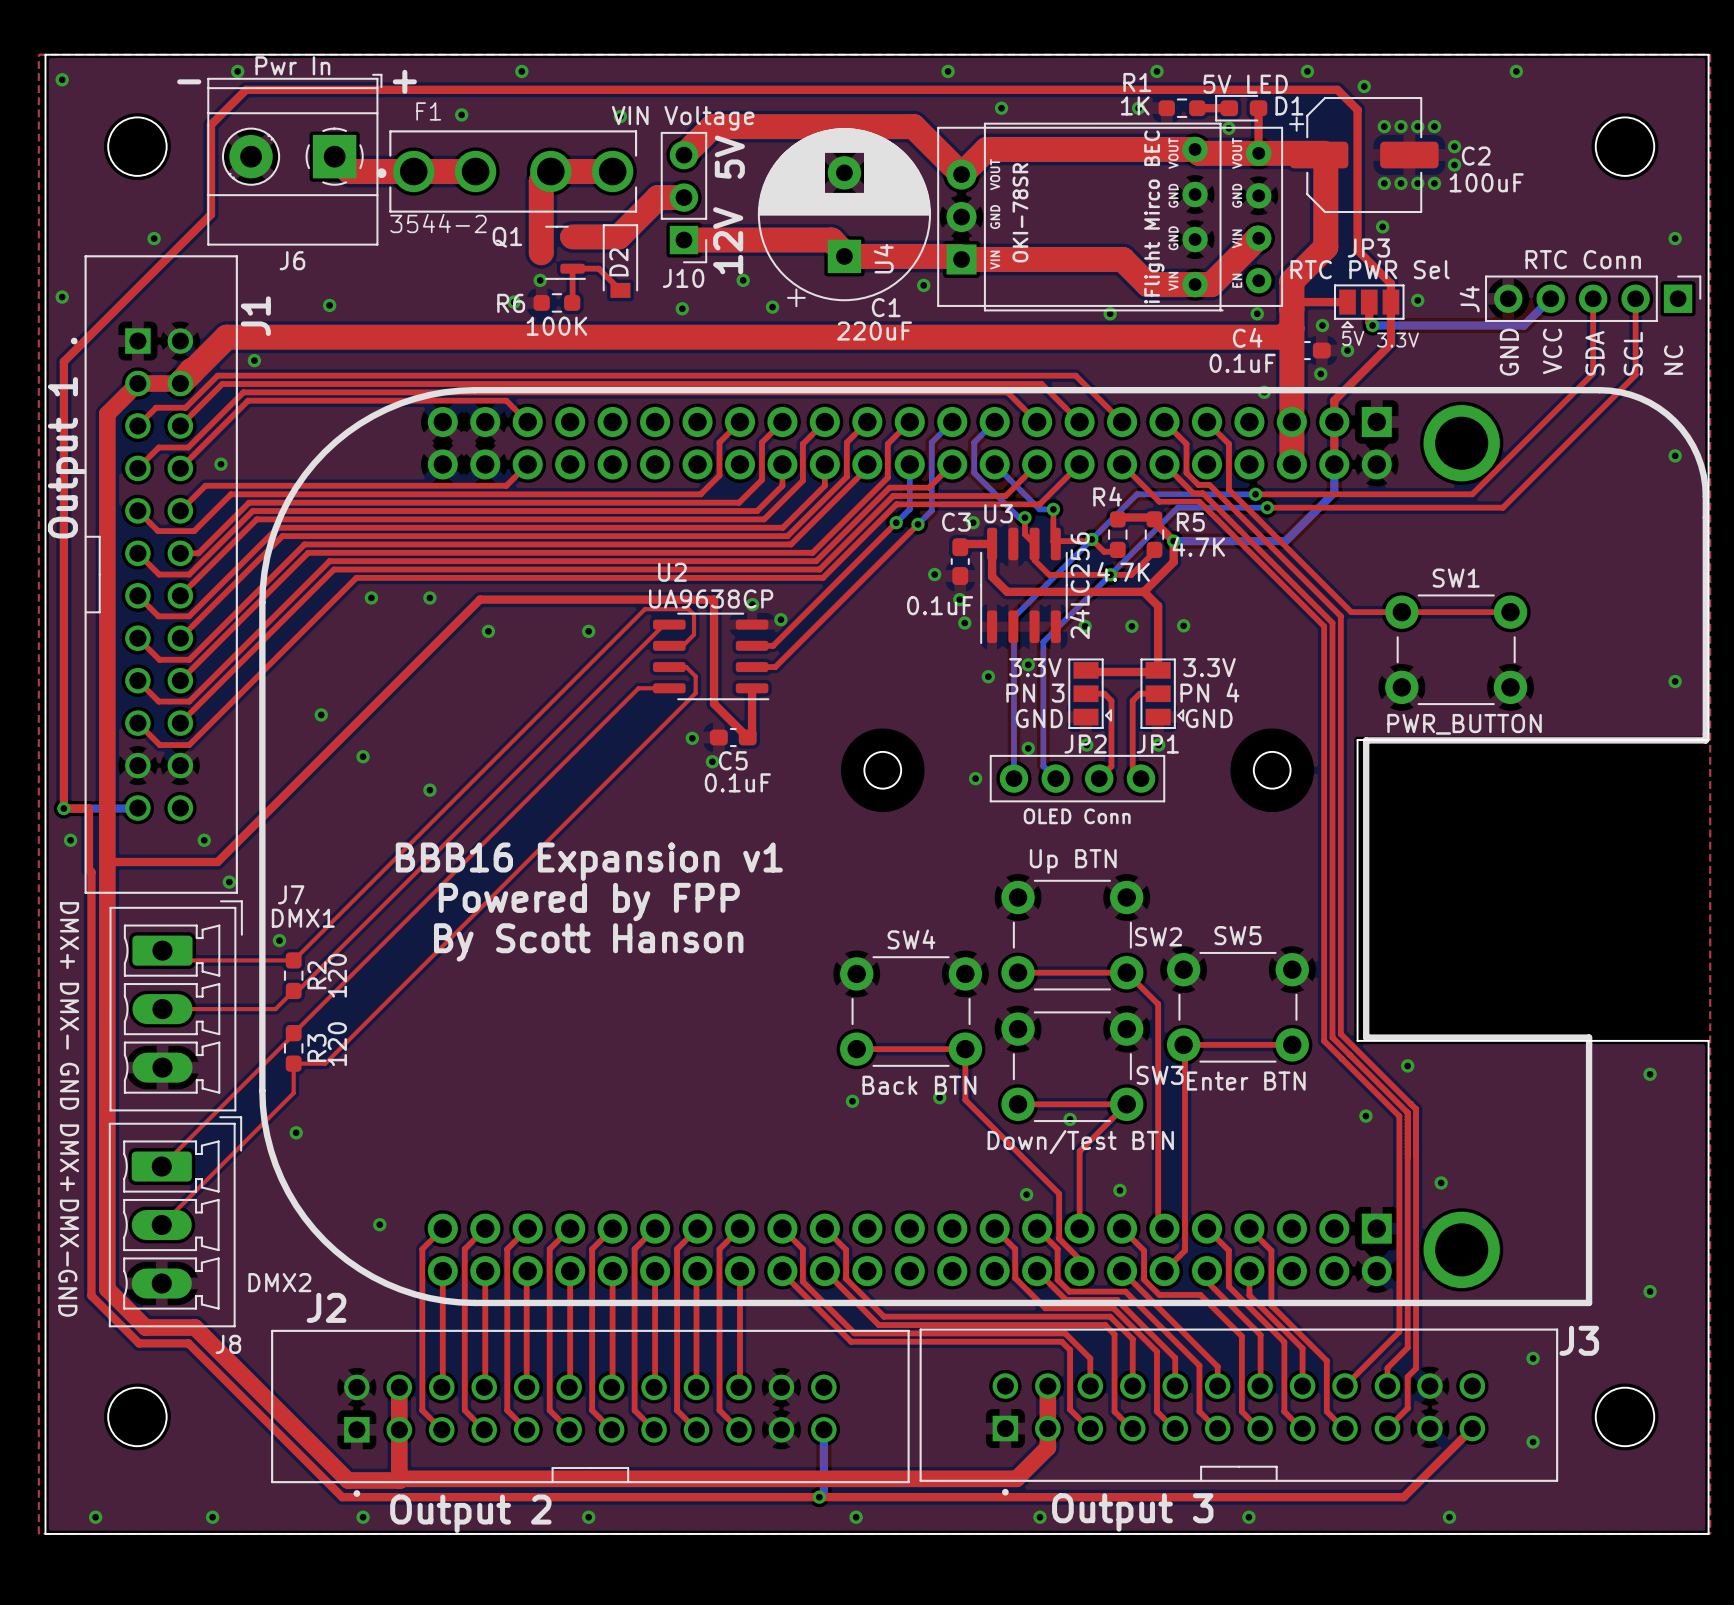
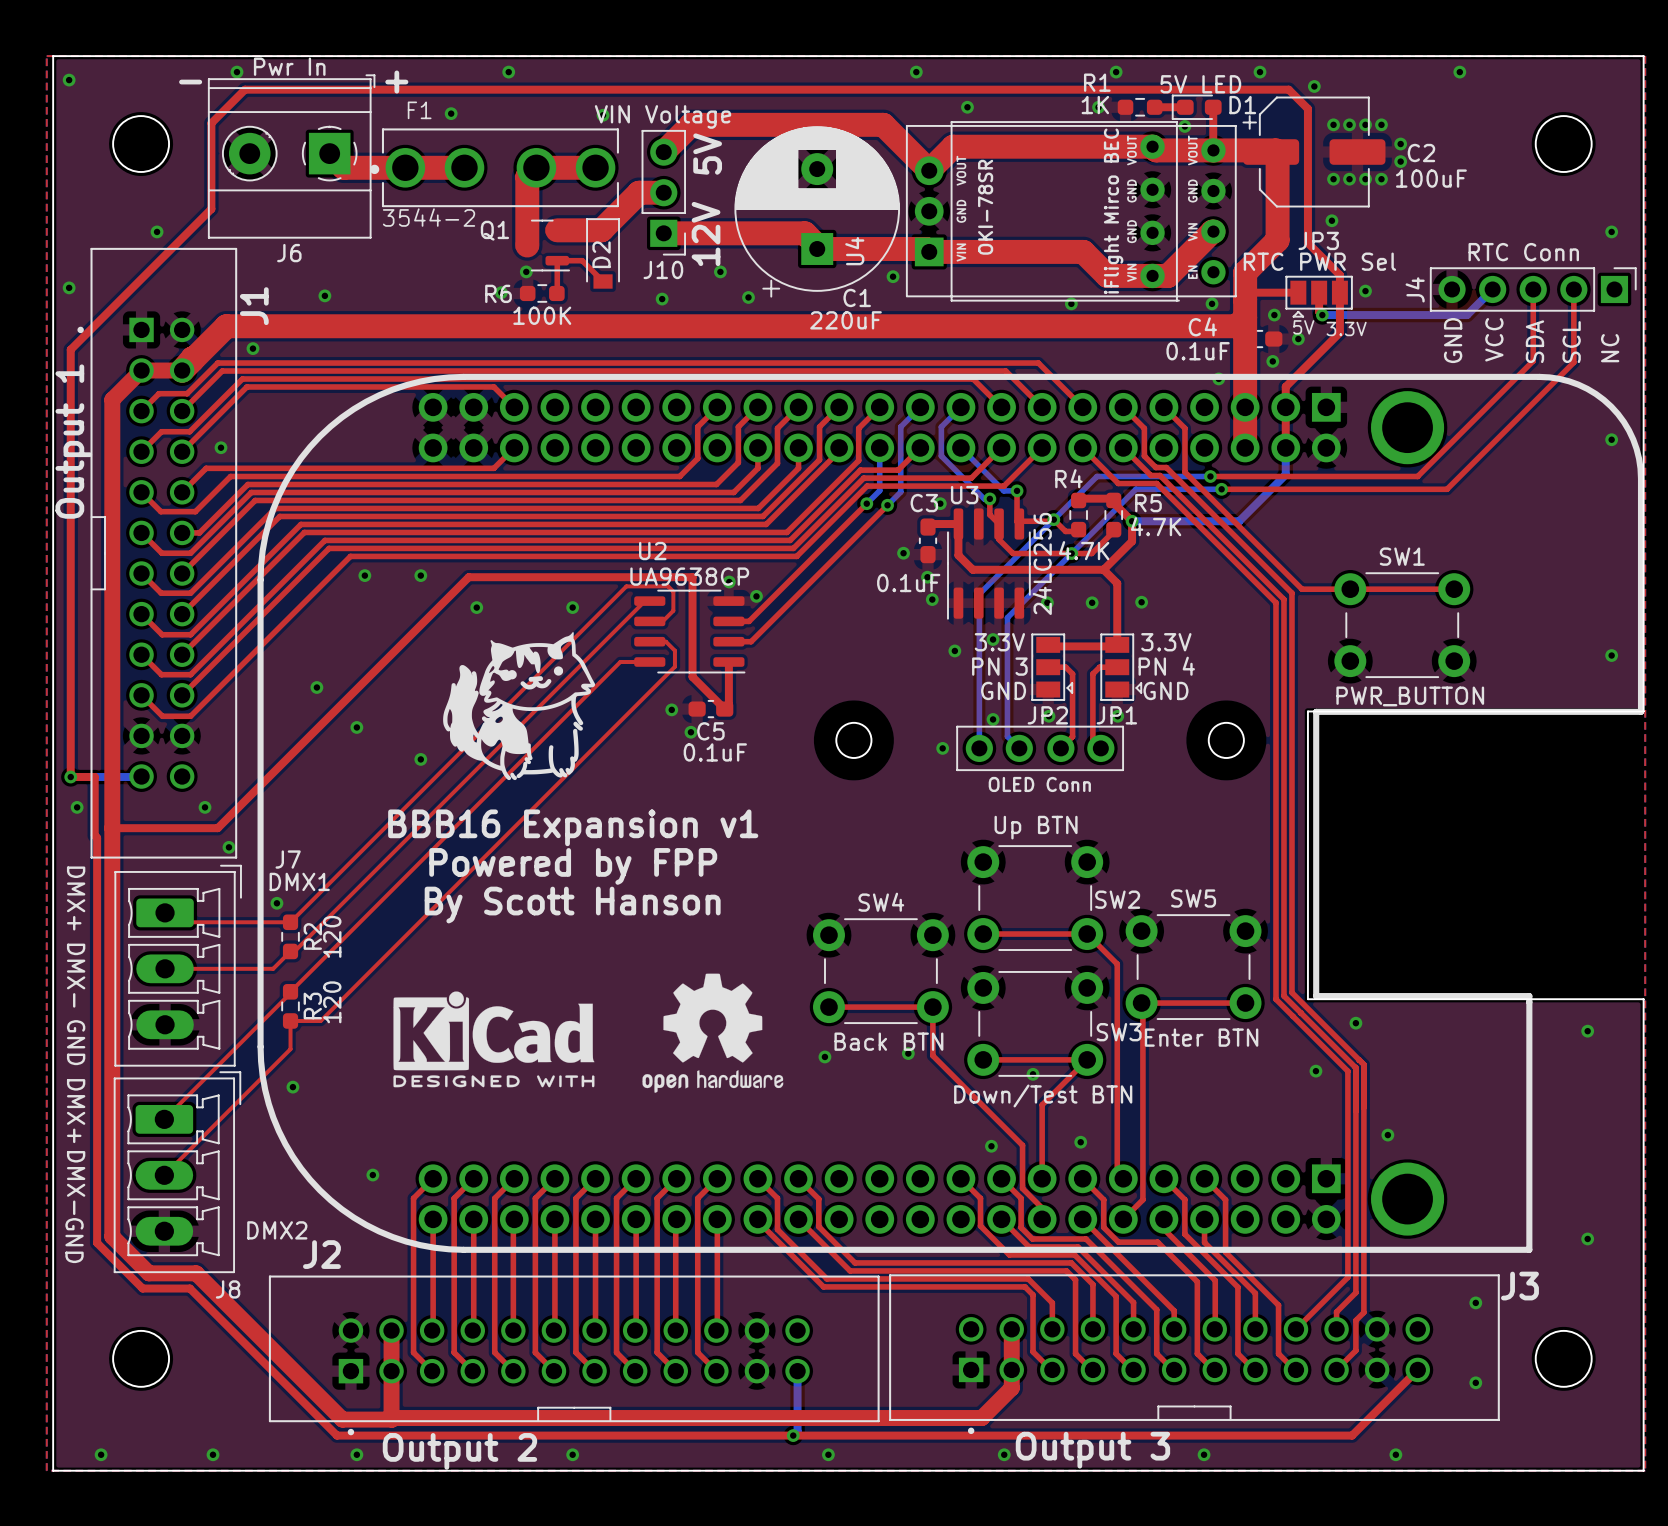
drawing: none -> [443, 632, 596, 781]
drawing: none -> [642, 973, 784, 1093]
drawing: none -> [393, 991, 595, 1088]

